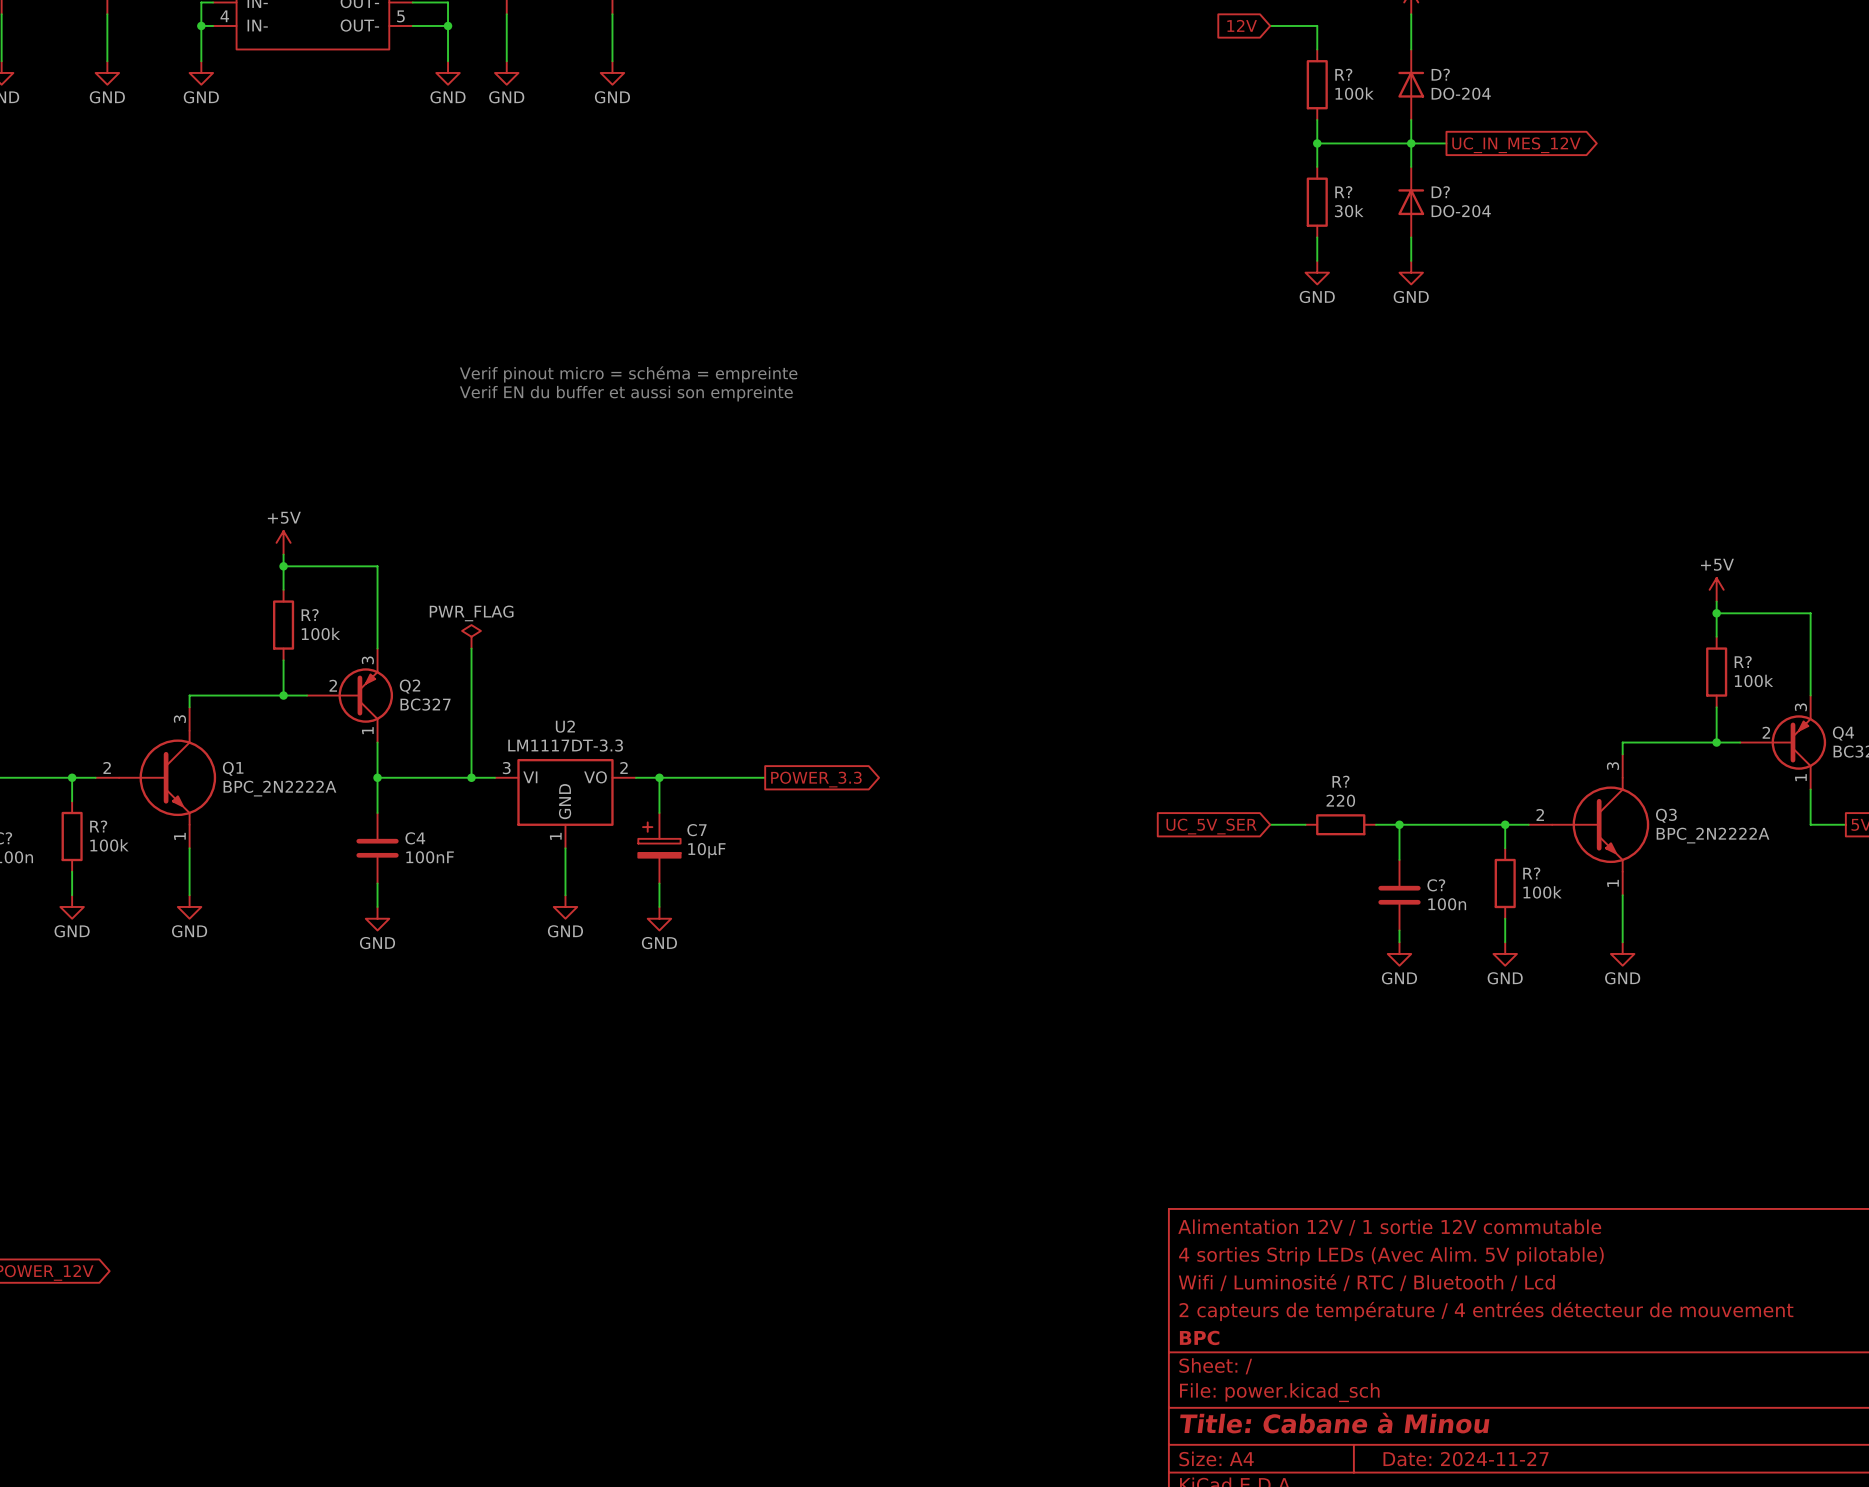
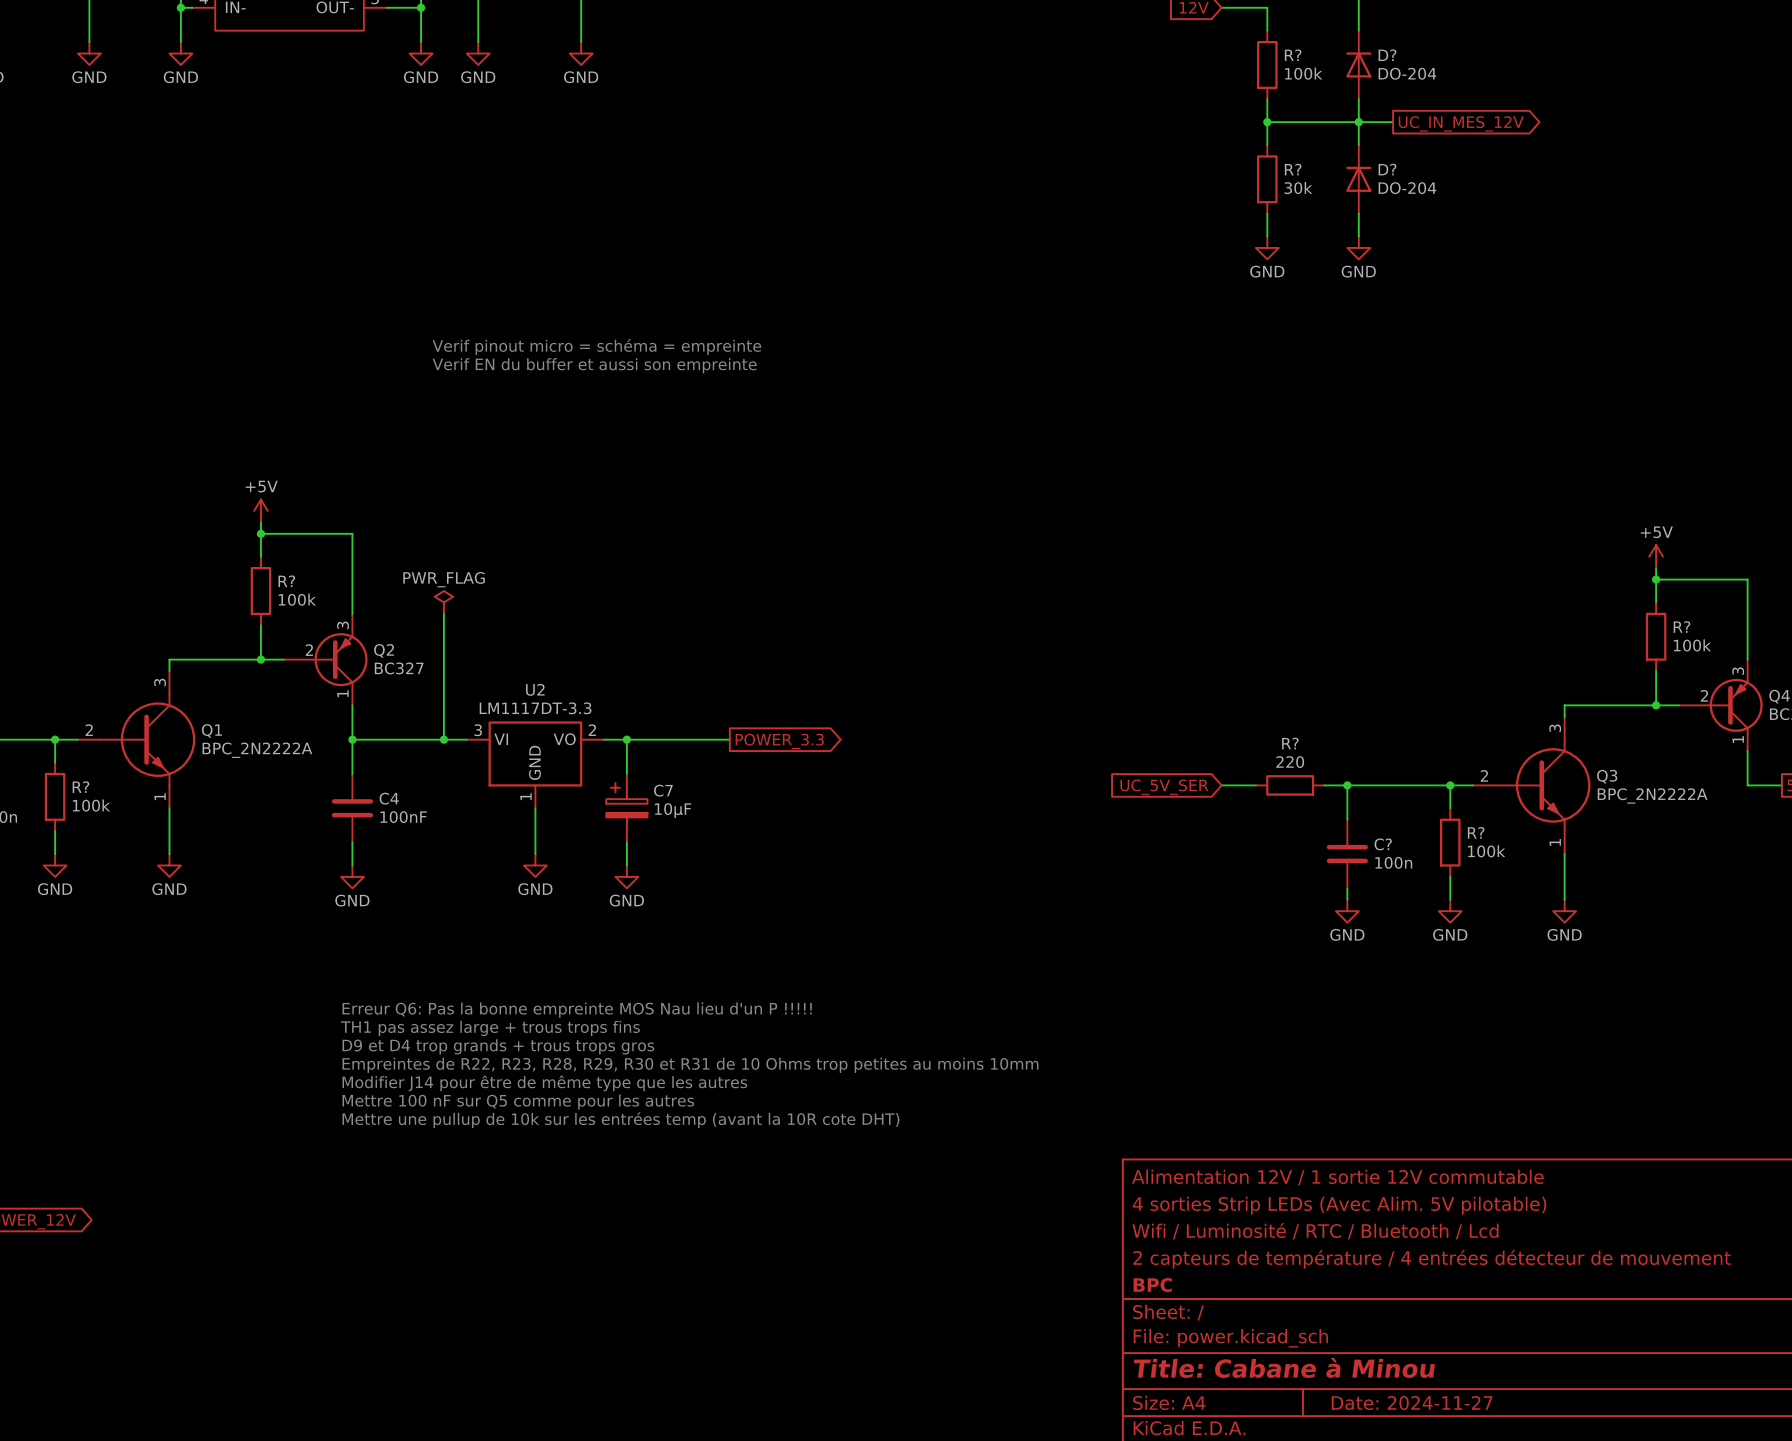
text: none -> Erreur Q6: Pas la bonne empreinte MOS Nau lieu d'un P !!!!! (577, 1010)
text: none -> TH1 pas assez large + trous trops fins (490, 1028)
text: none -> D9 et D4 trop grands + trous trops gros (498, 1046)
text: none -> Empreintes de R22, R23, R28, R29, R30 et R31 de 10 Ohms trop petites au moins 10mm (690, 1065)
text: none -> Modifier J14 pour être de même type que les autres (544, 1083)
text: none -> Mettre 100 nF sur Q5 comme pour les autres (518, 1102)
text: none -> Mettre une pullup de 10k sur les entrées temp (avant la 10R cote DHT) (620, 1120)

